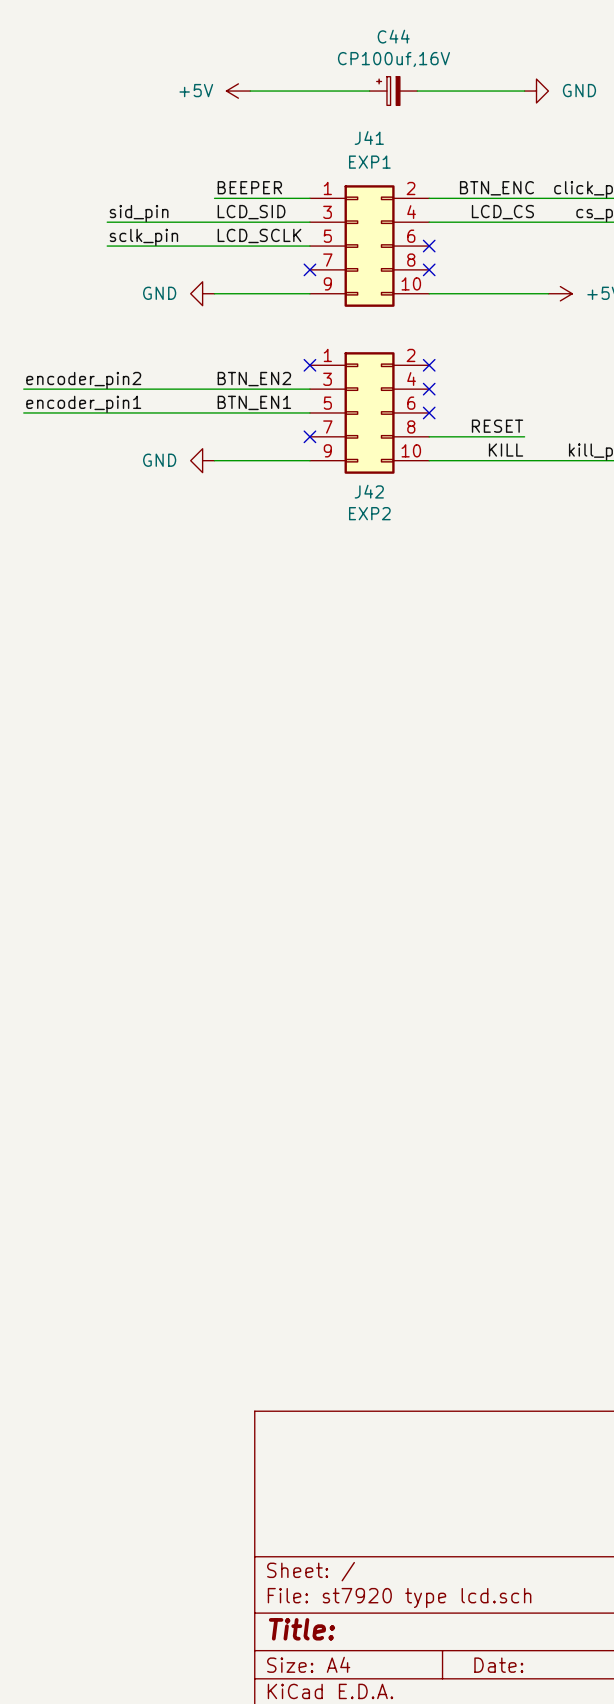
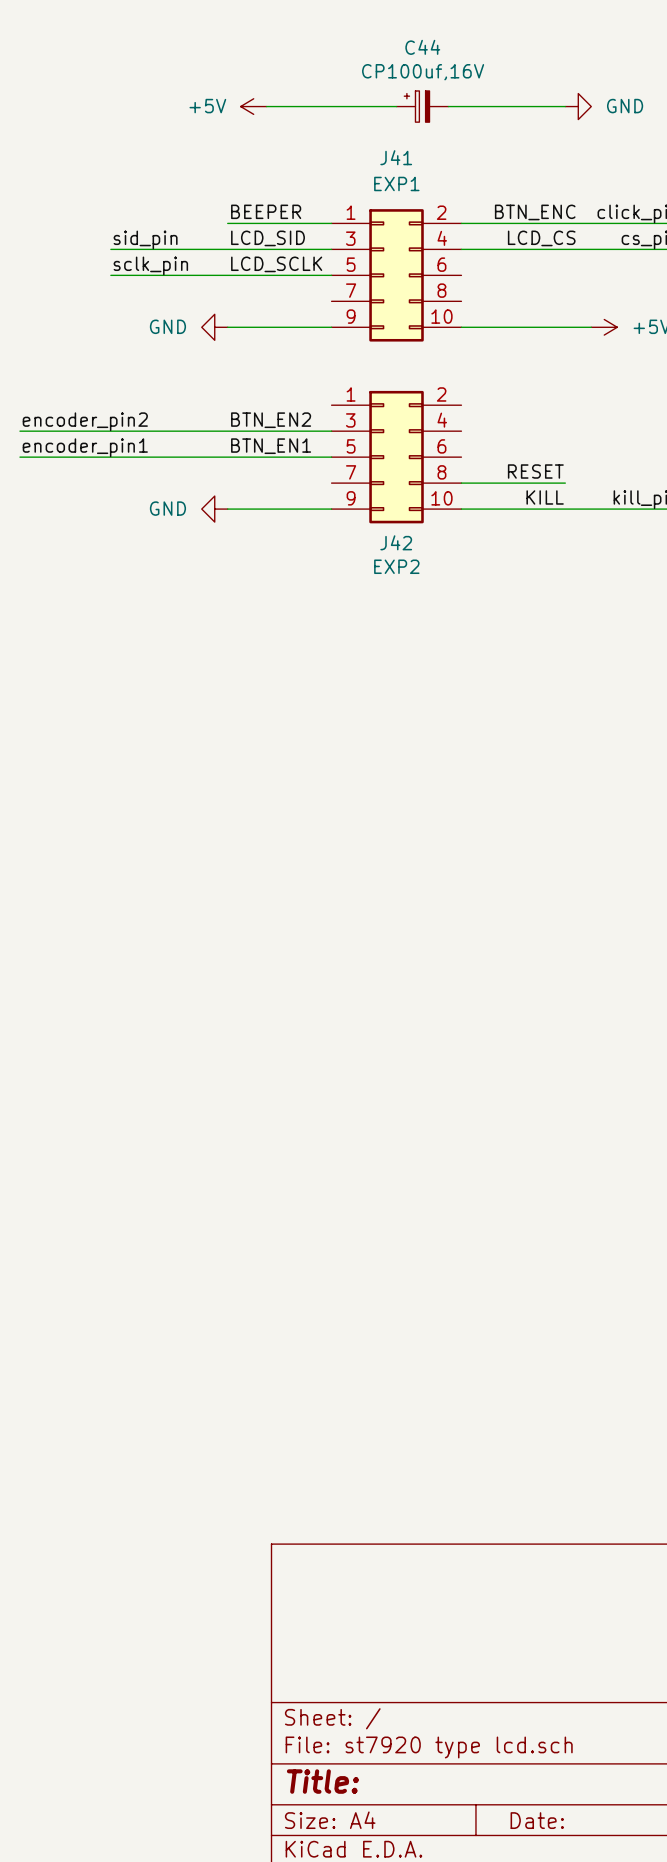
no-connect mark: (429, 246) -> none
no-connect mark: (309, 269) -> none
no-connect mark: (429, 269) -> none
no-connect mark: (309, 365) -> none
no-connect mark: (429, 365) -> none
no-connect mark: (429, 389) -> none
no-connect mark: (429, 412) -> none
no-connect mark: (309, 436) -> none

